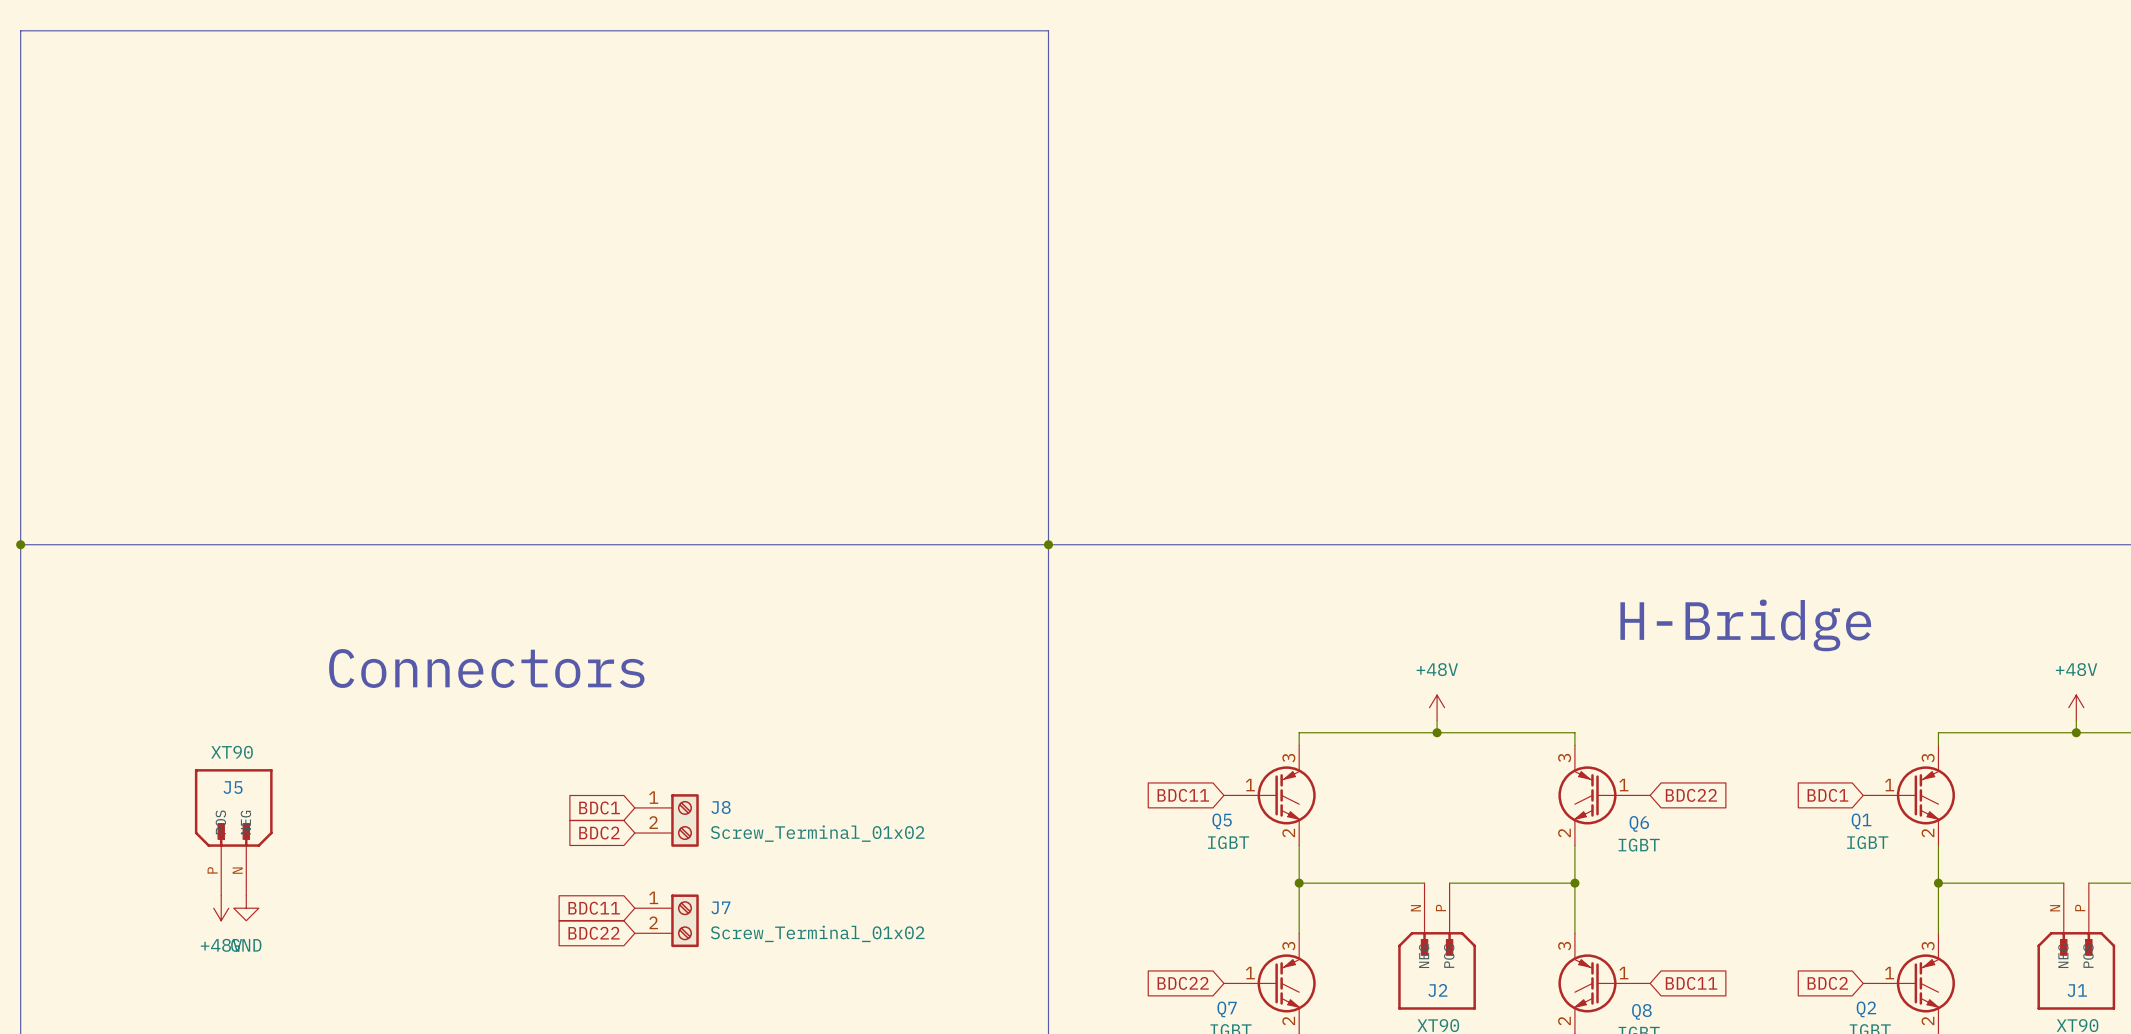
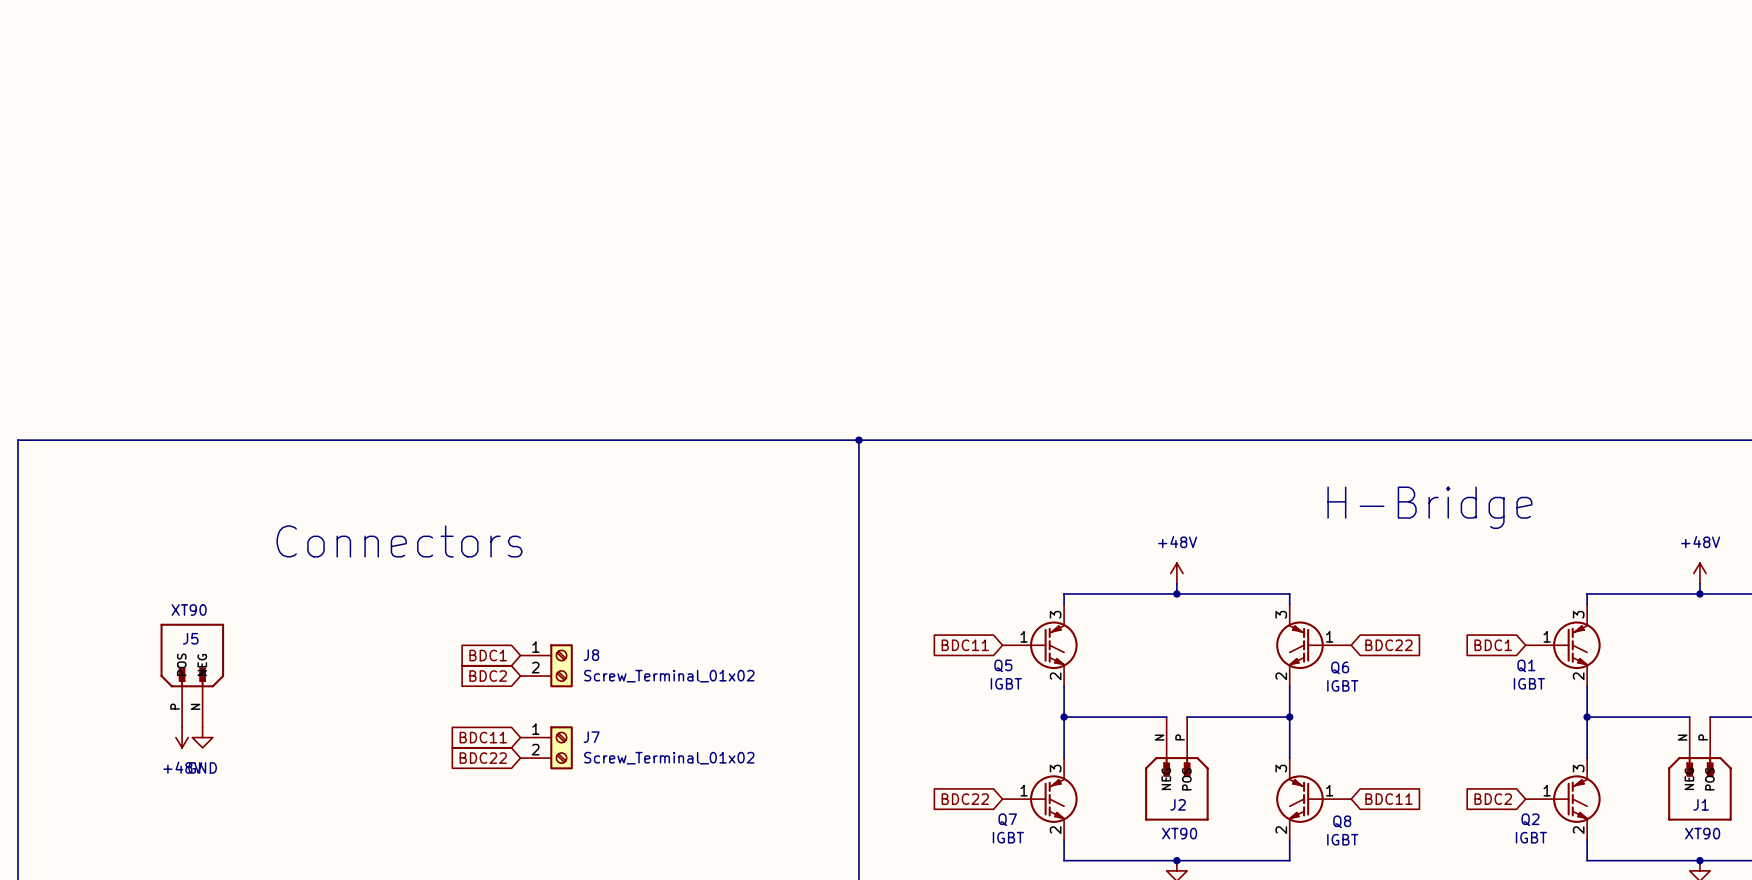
bus: (20, 544) (20, 30) (1048, 30) (1048, 544) -> none
junction: (20, 544) -> none

